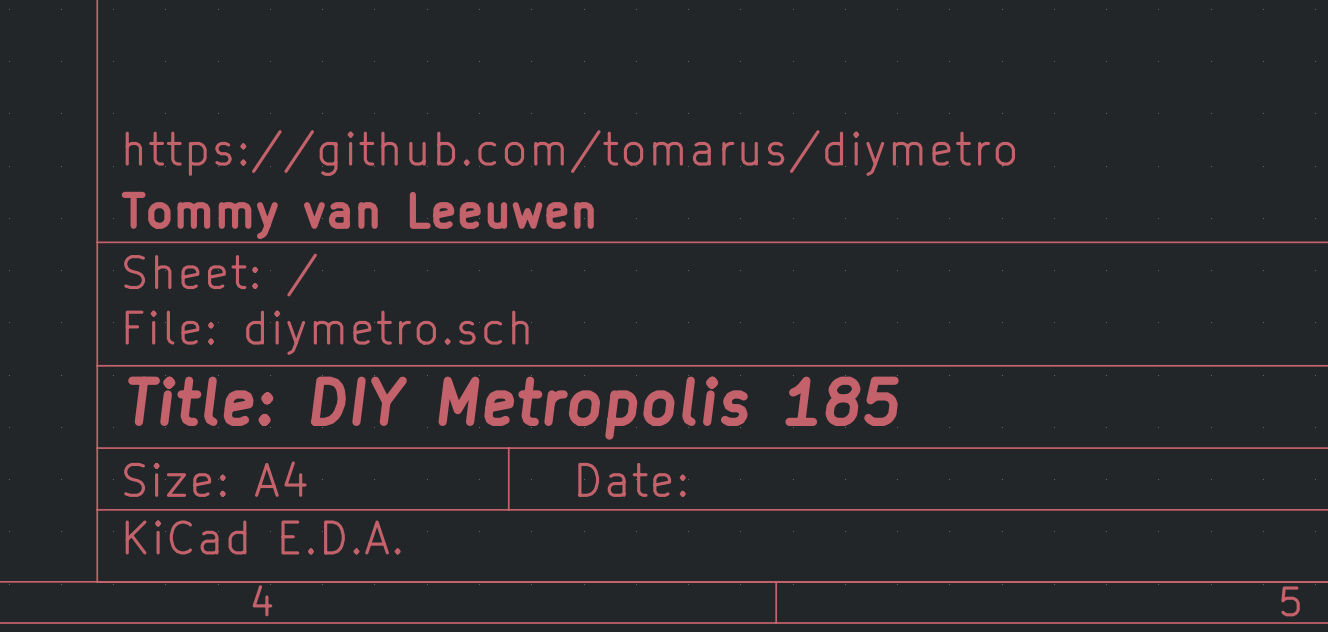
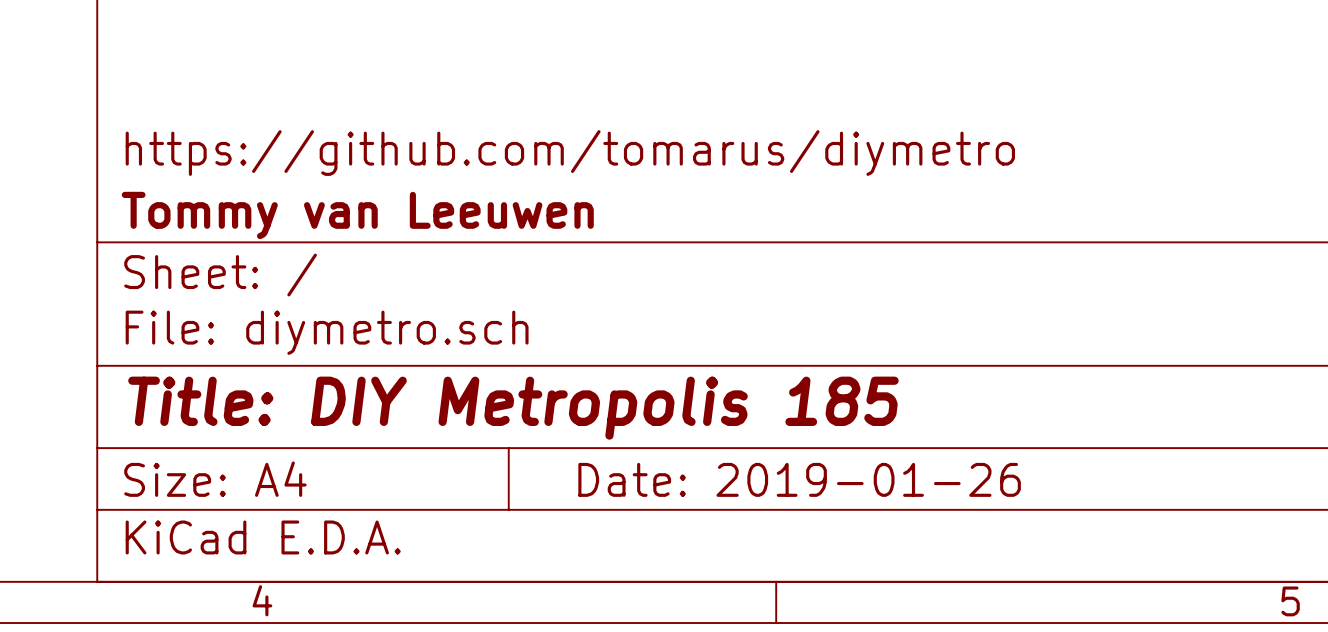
title block: Date: (632, 479) -> Date: 2019-01-26 (799, 479)

